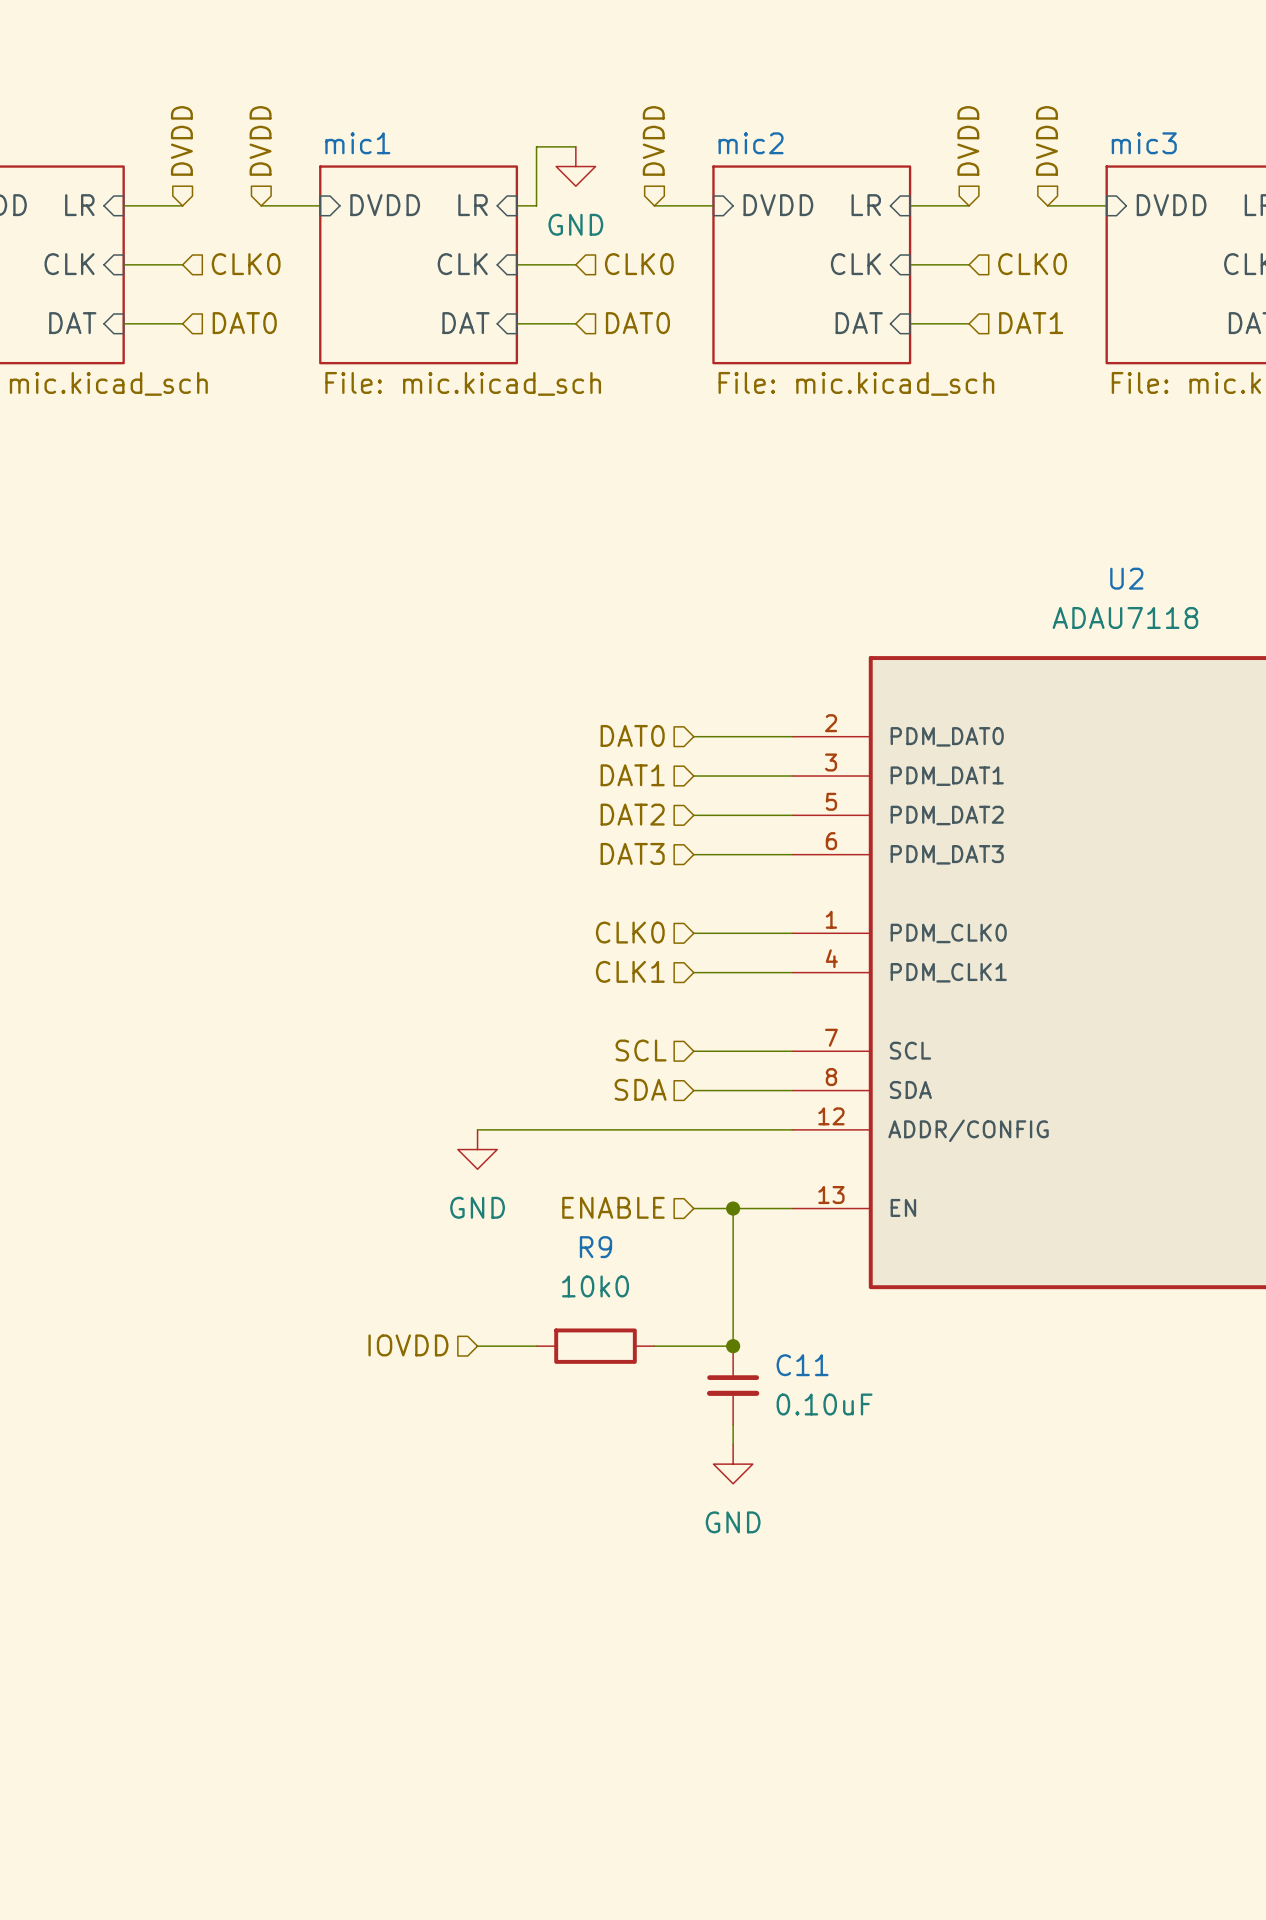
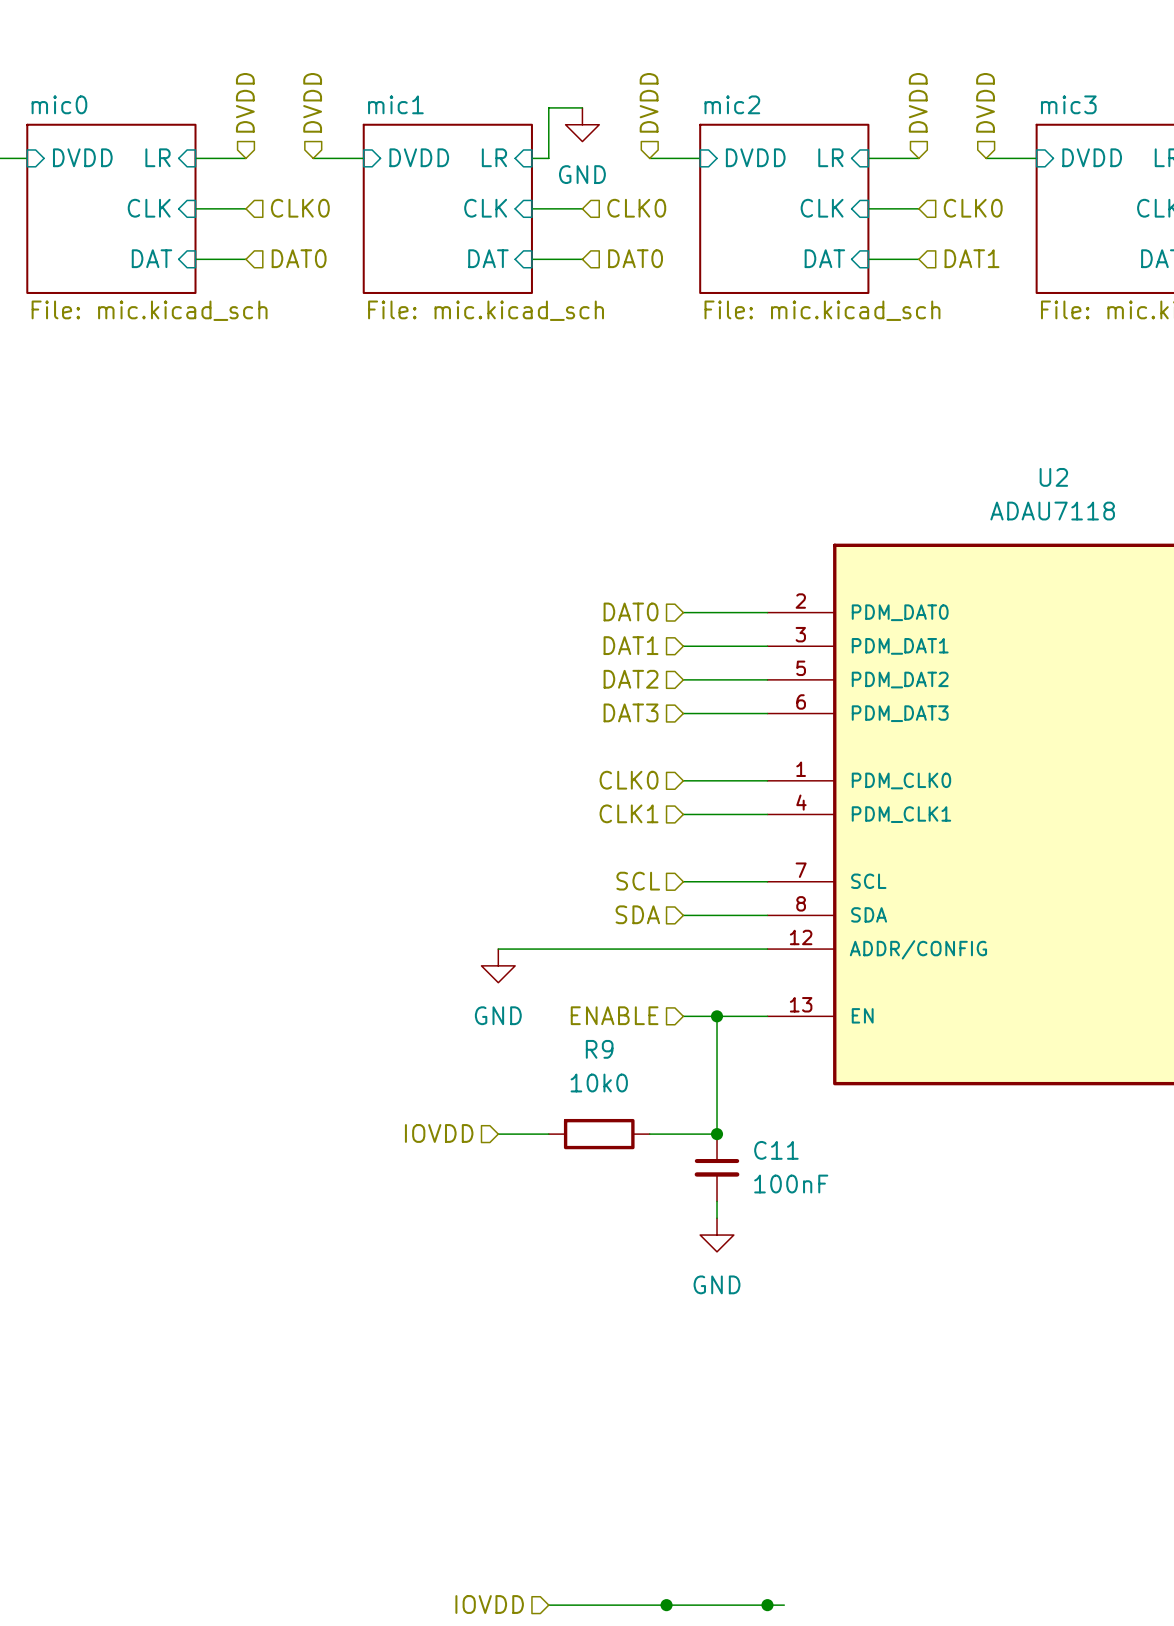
C11 value: 0.10uF (824, 1404) -> 100nF (791, 1184)
hierarchical label: none -> IOVDD (489, 1604)
wire: none -> (548, 1605) (784, 1605)
junction: none -> (666, 1605)
junction: none -> (767, 1605)

